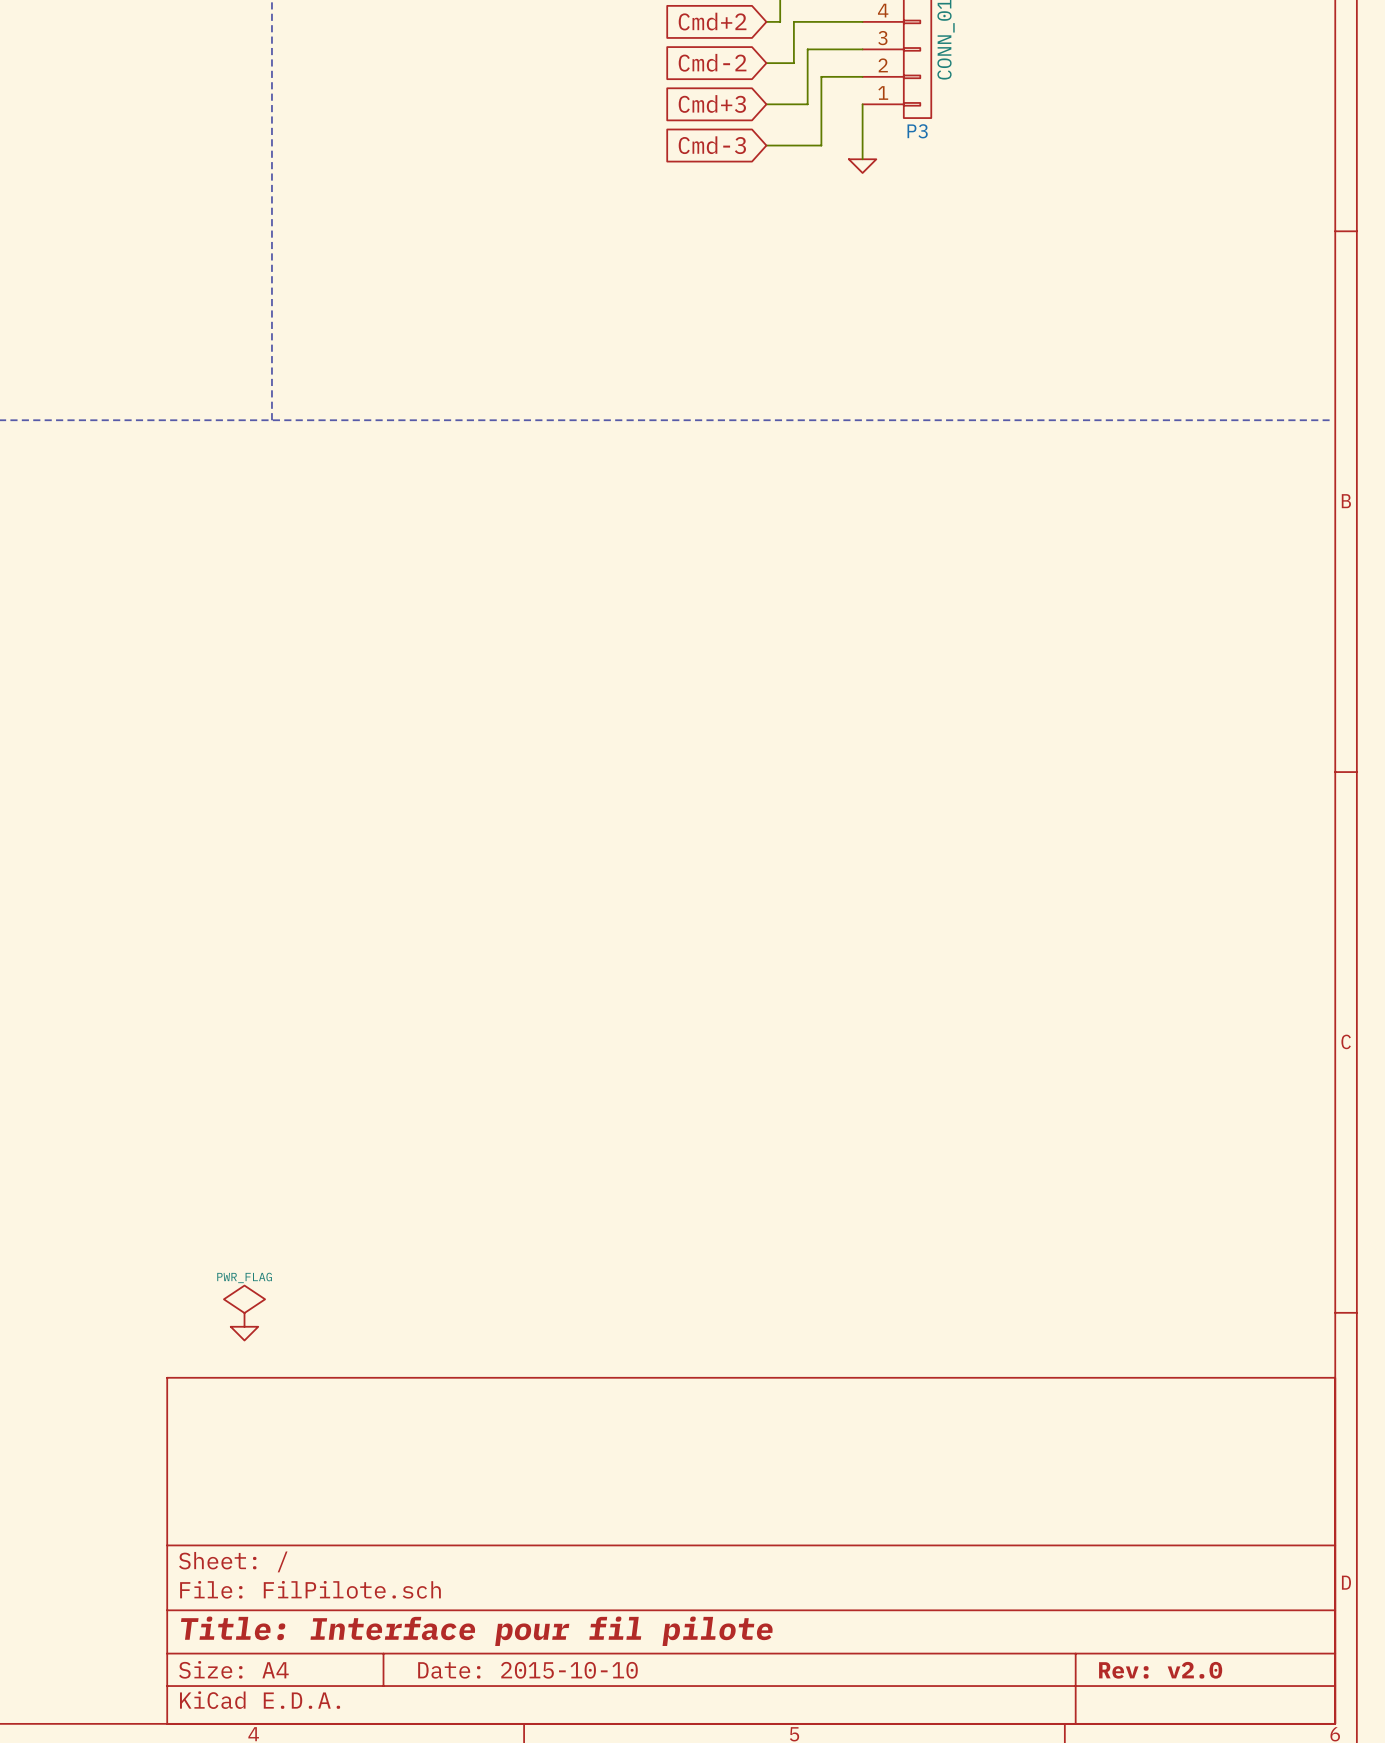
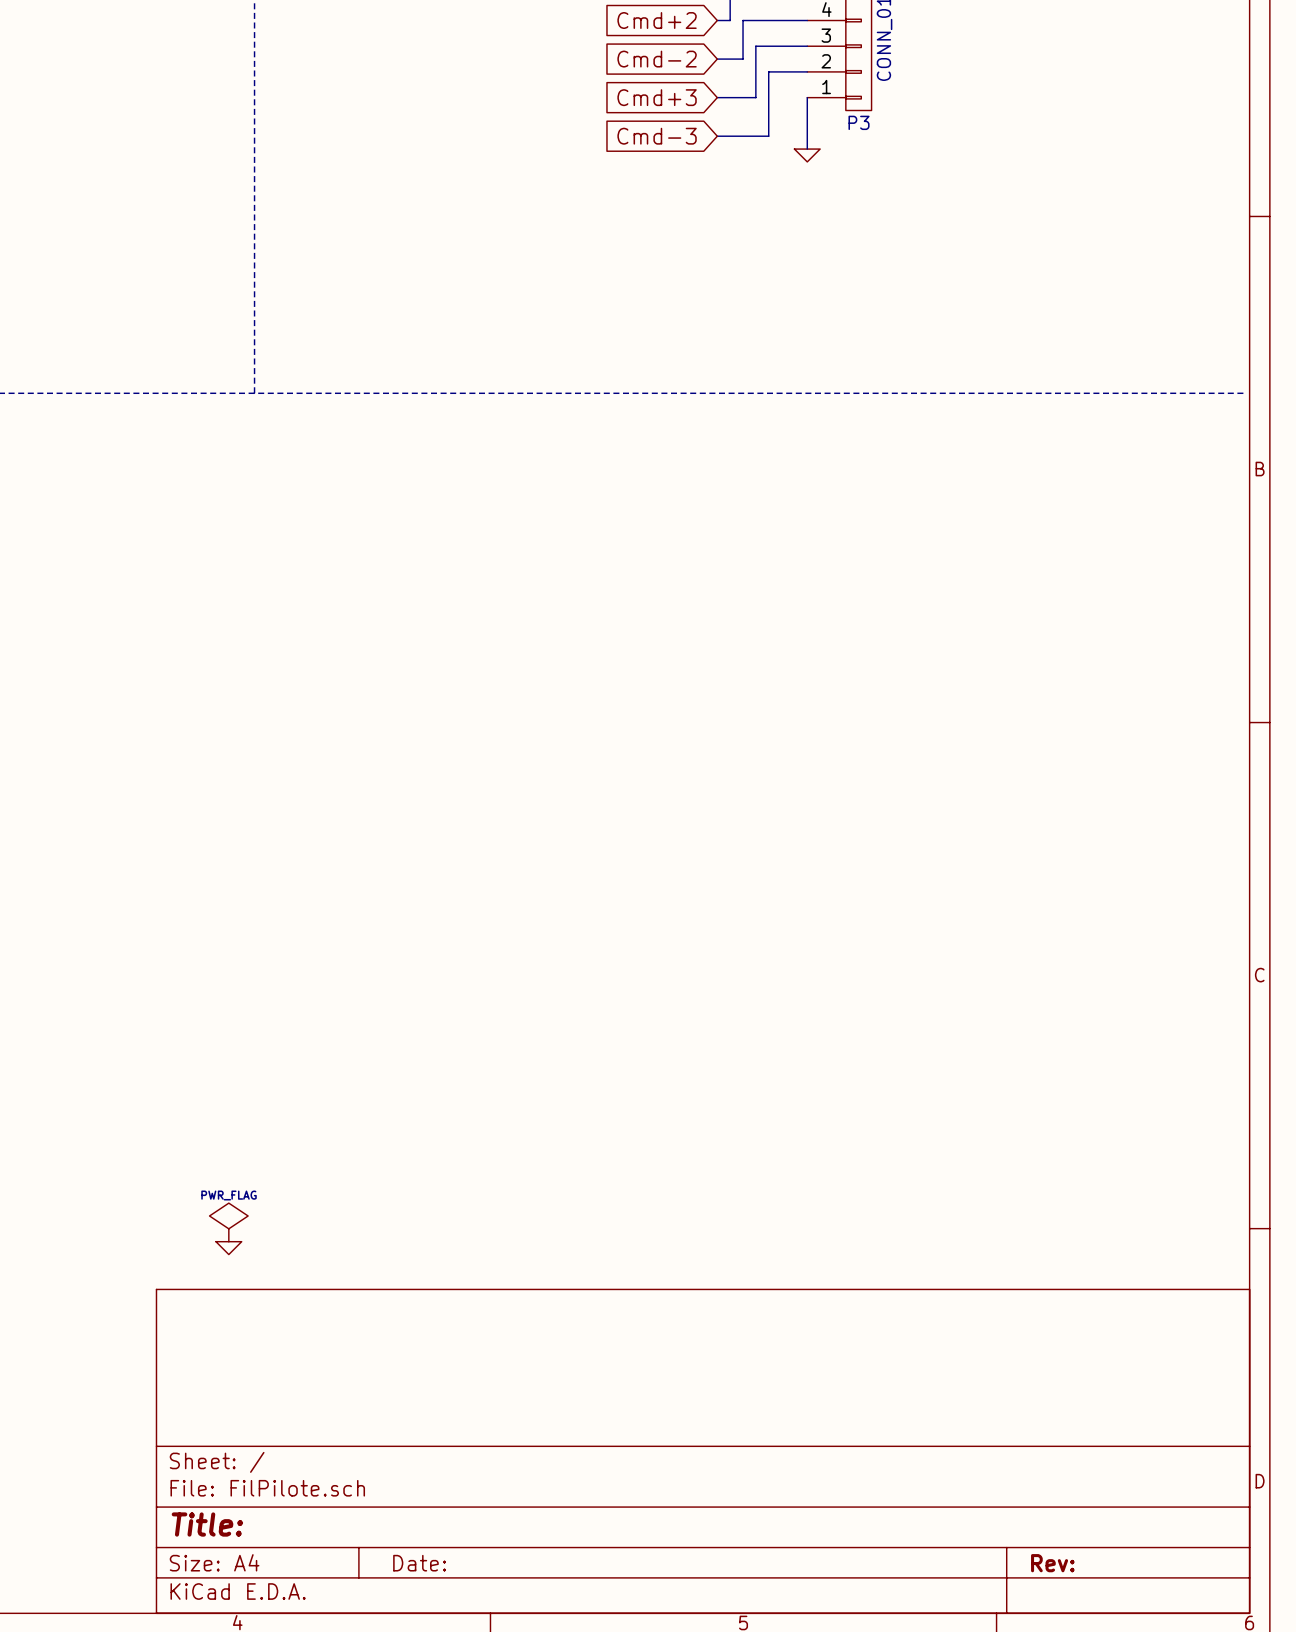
title block: Title: Interface pour fil pilote (476, 1631) -> Title: (207, 1524)
title block: Date: 2015-10-10 (527, 1670) -> Date: (419, 1563)
title block: Rev: v2.0 (1160, 1670) -> Rev: (1052, 1563)

